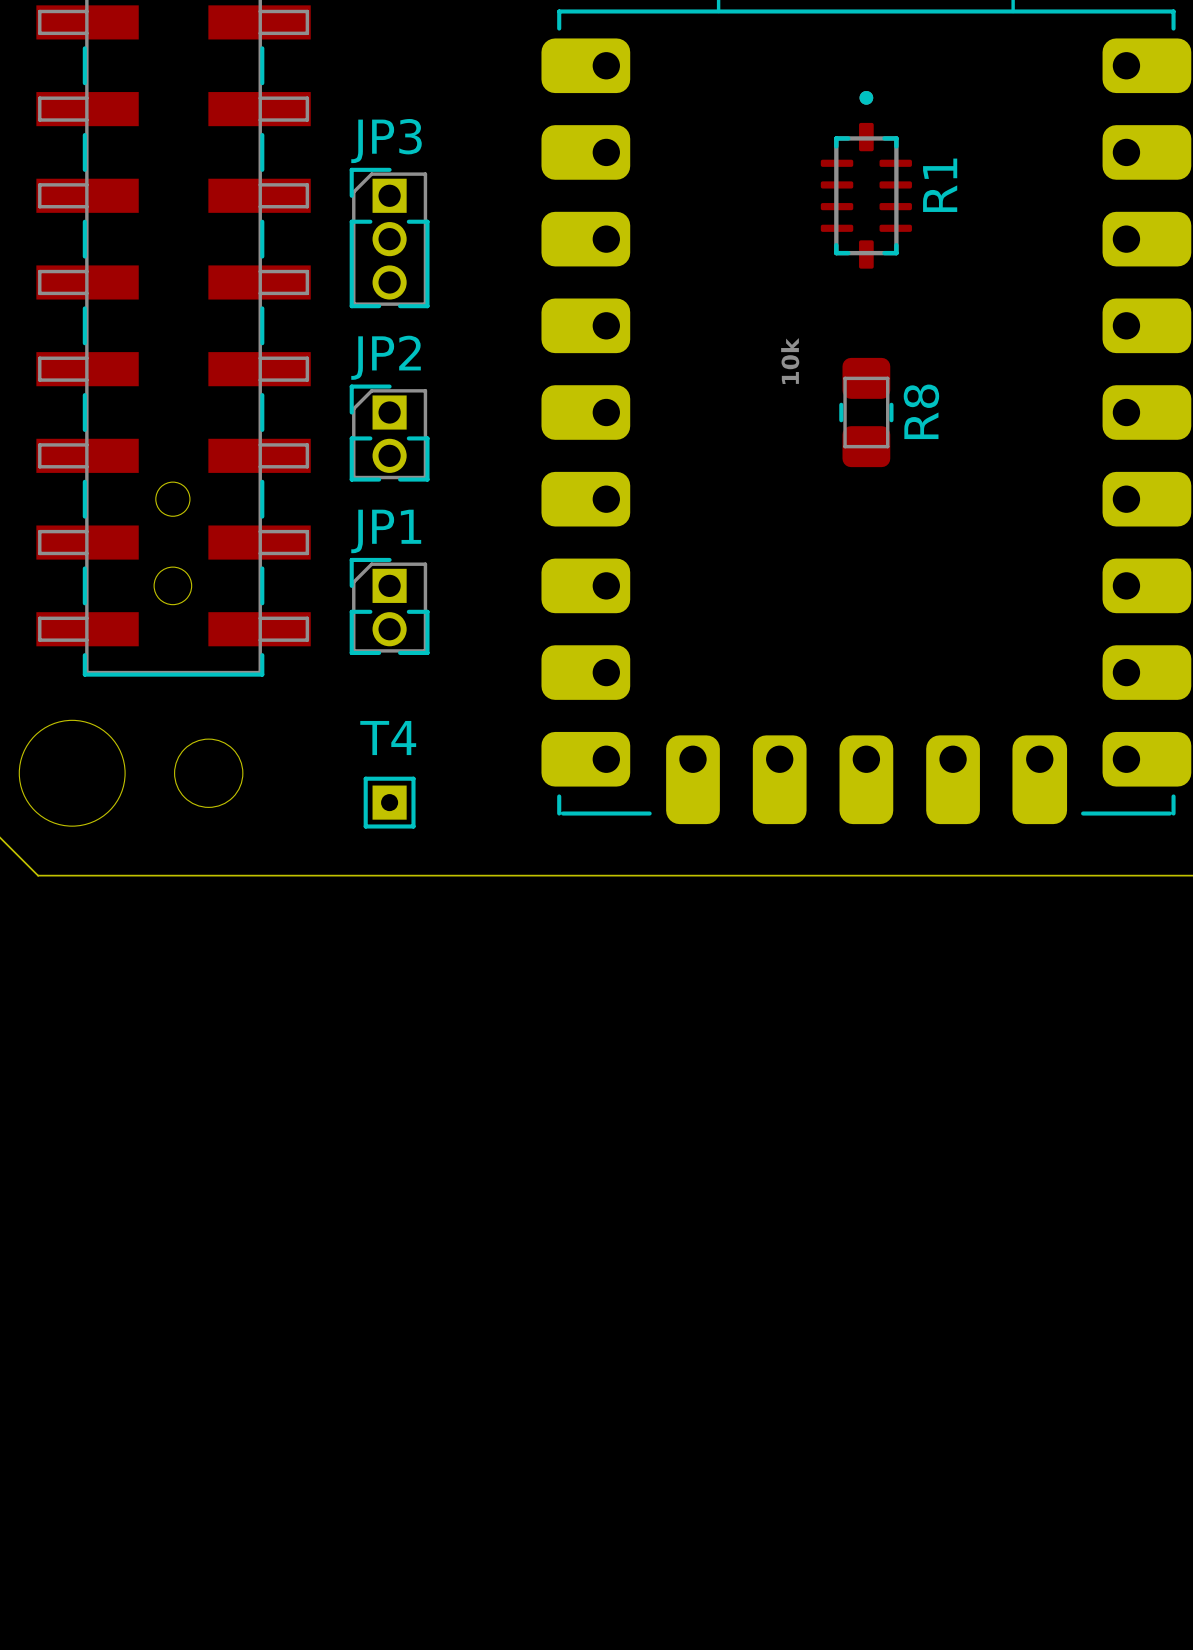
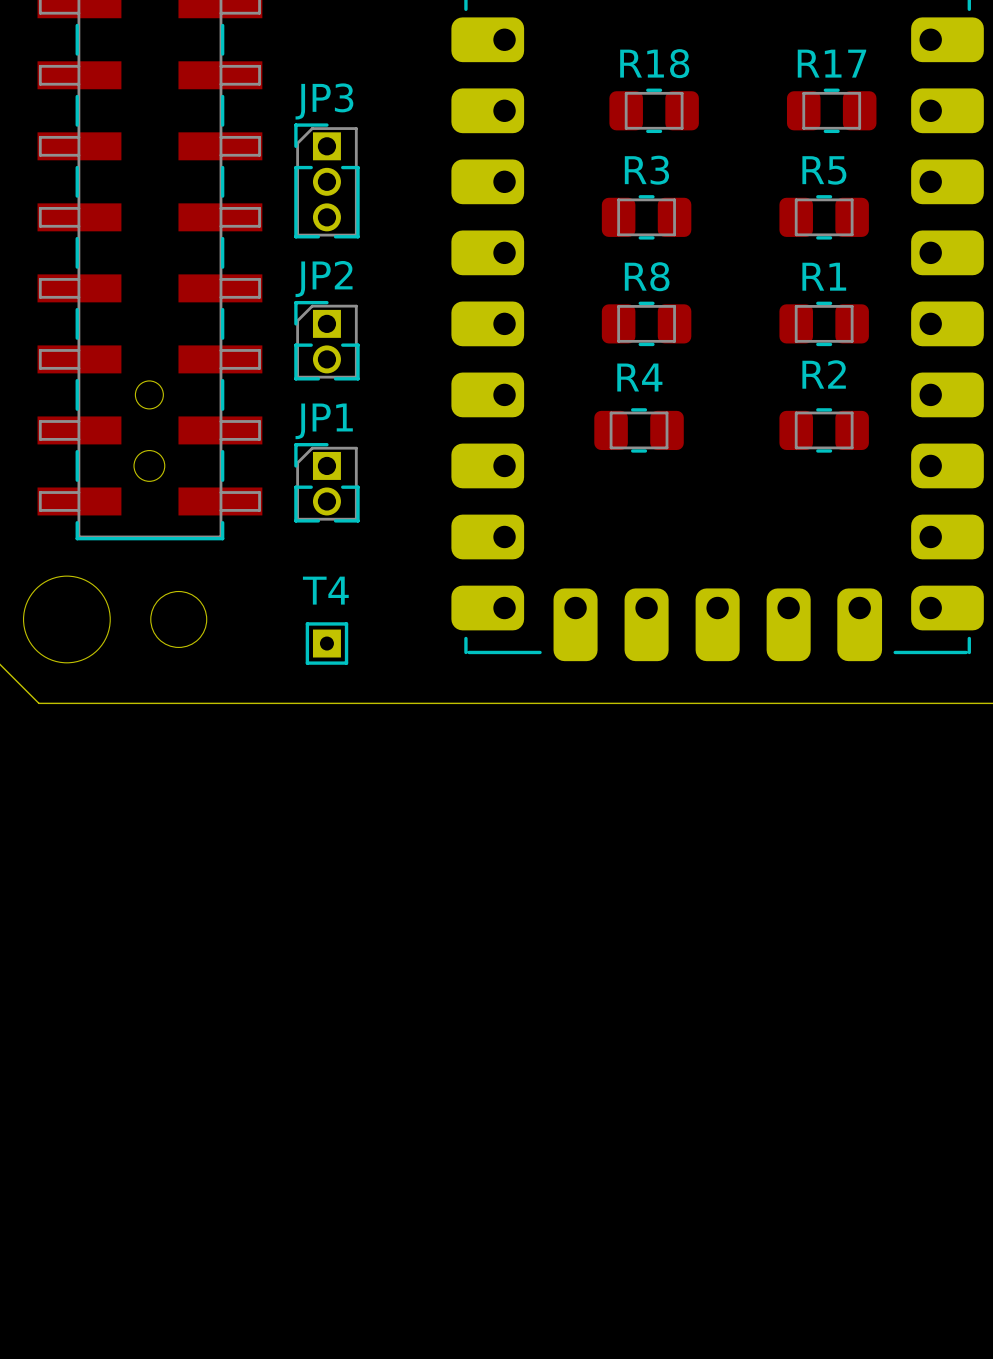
R1 footprint: [820, 91, 912, 269] -> [779, 301, 869, 347]
R18: none -> (654, 110)
R17: none -> (831, 110)
R1 name position: R1 (940, 185) -> R1 (824, 276)
R3: none -> (646, 217)
R5: none -> (824, 217)
R1 value: 10k (790, 361) -> none
R8 name position: R8 (921, 411) -> R8 (647, 276)
R8 rotation: 0° (866, 412) -> 90° clockwise (646, 323)
R8 position: (866, 412) -> (646, 323)
R4: none -> (639, 430)
R2: none -> (824, 430)

